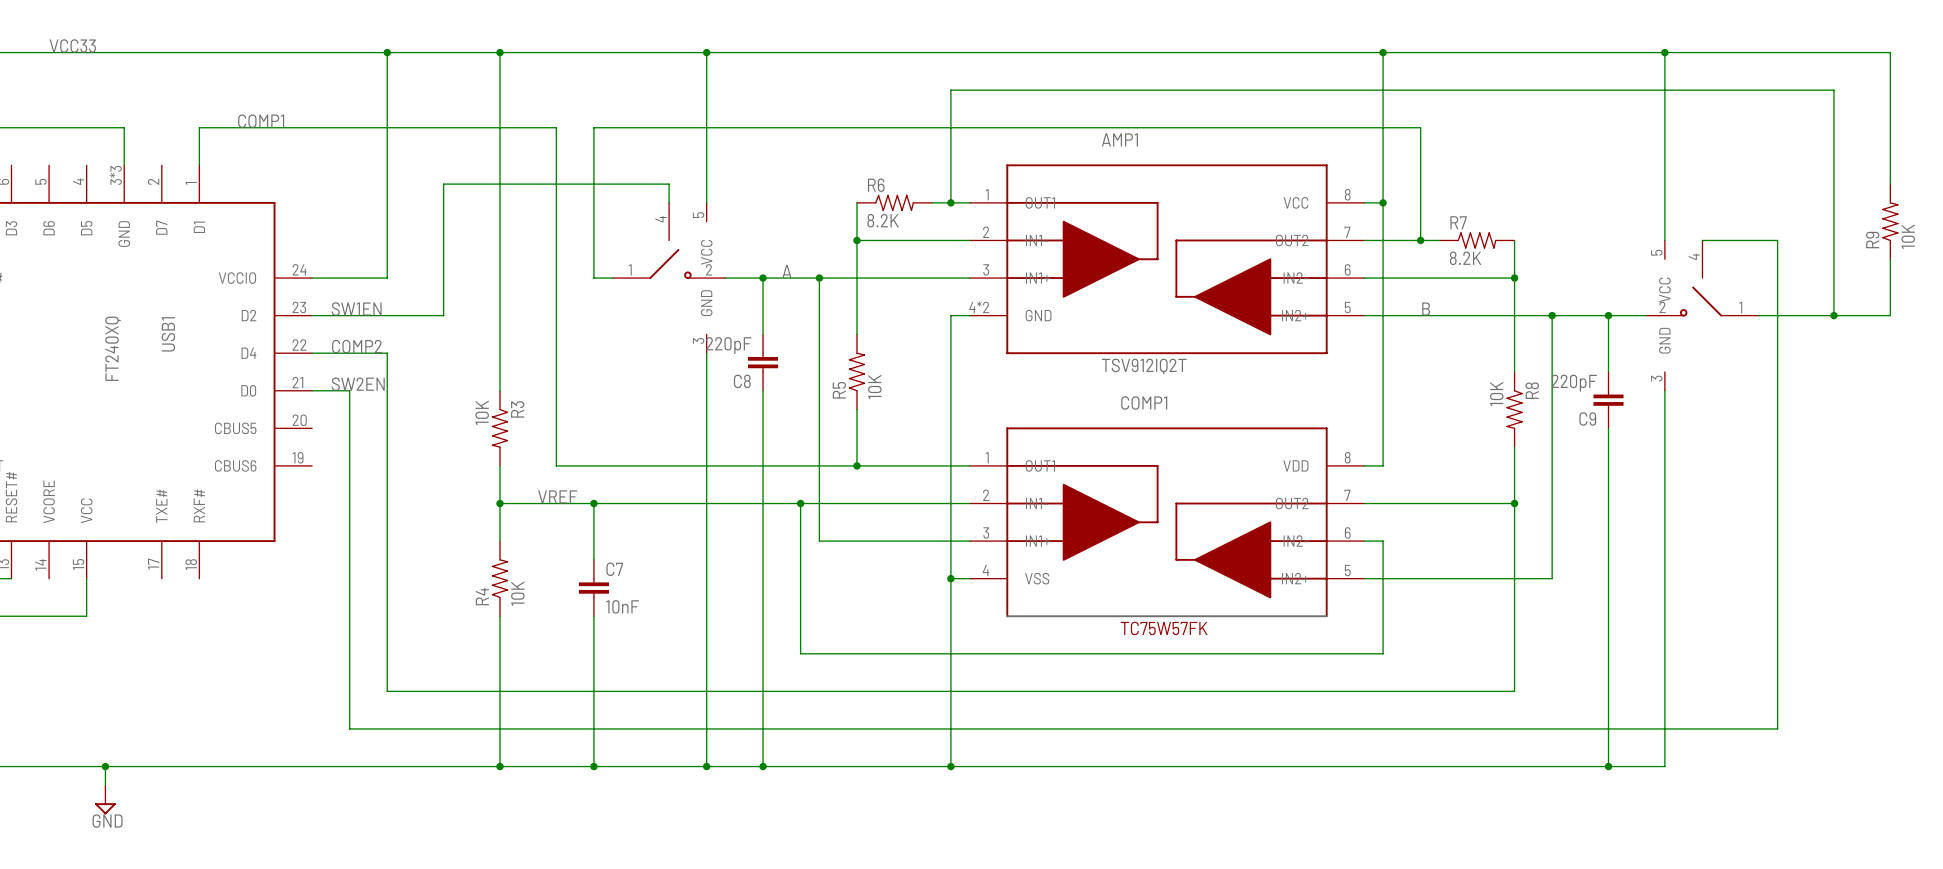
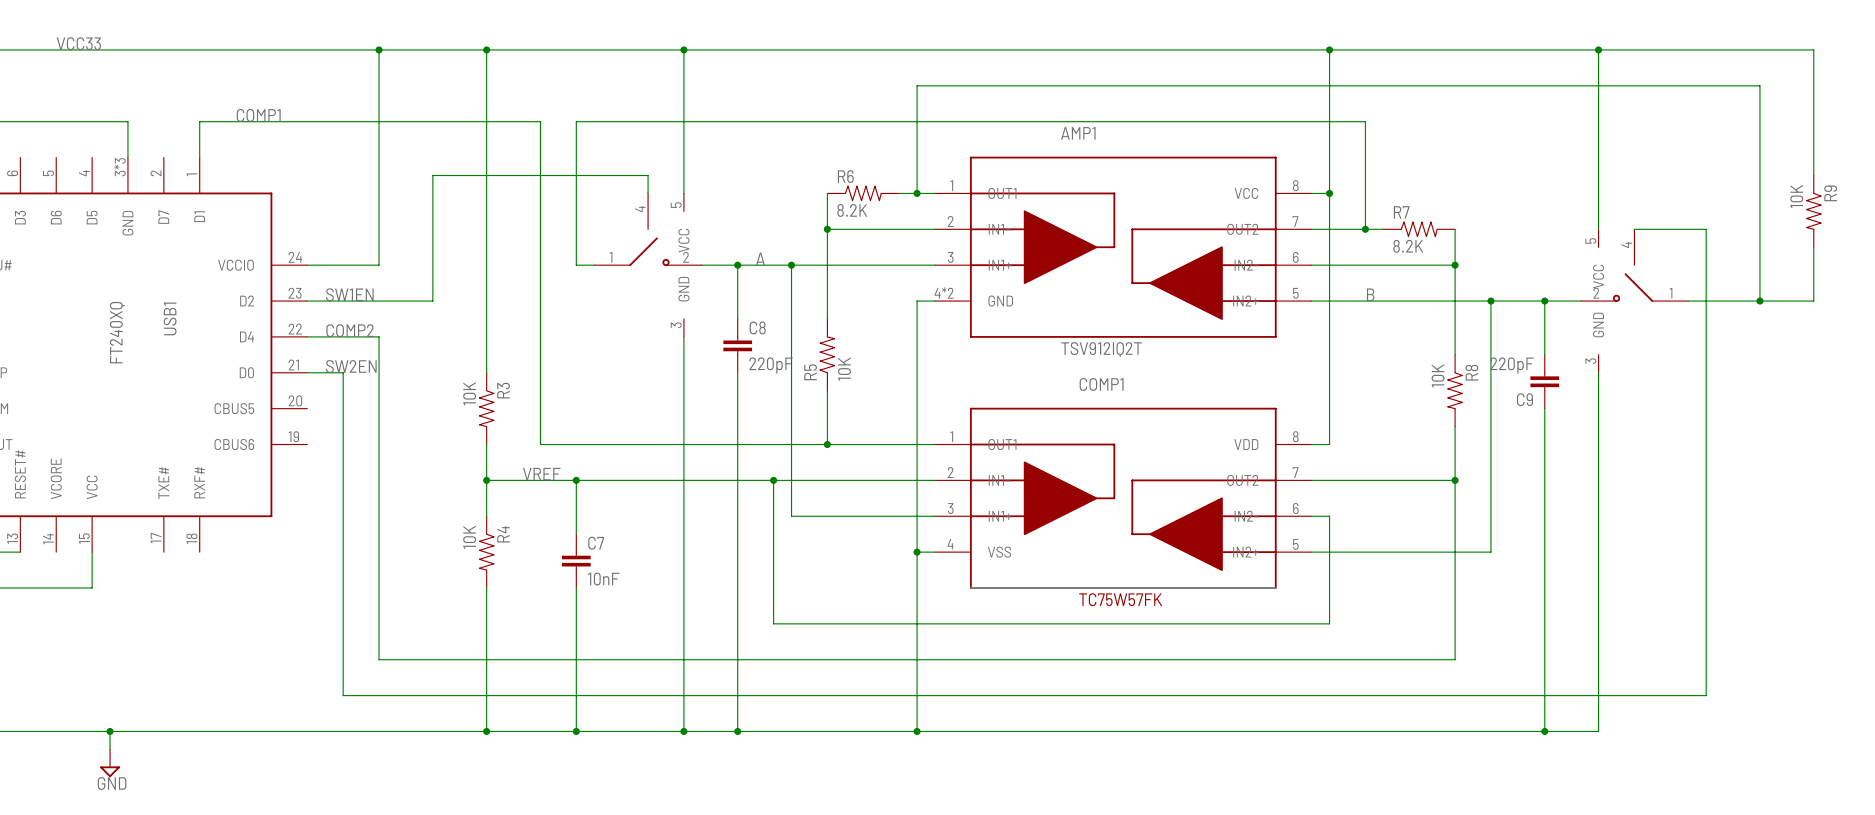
R9 rotation: 0° (1890, 221) -> 180° (1813, 211)
C8 value position: 220pF (728, 345) -> 220pF (771, 365)
C8 name position: C8 (742, 381) -> C8 (757, 327)
R4 rotation: 0° (499, 578) -> 180° (486, 552)

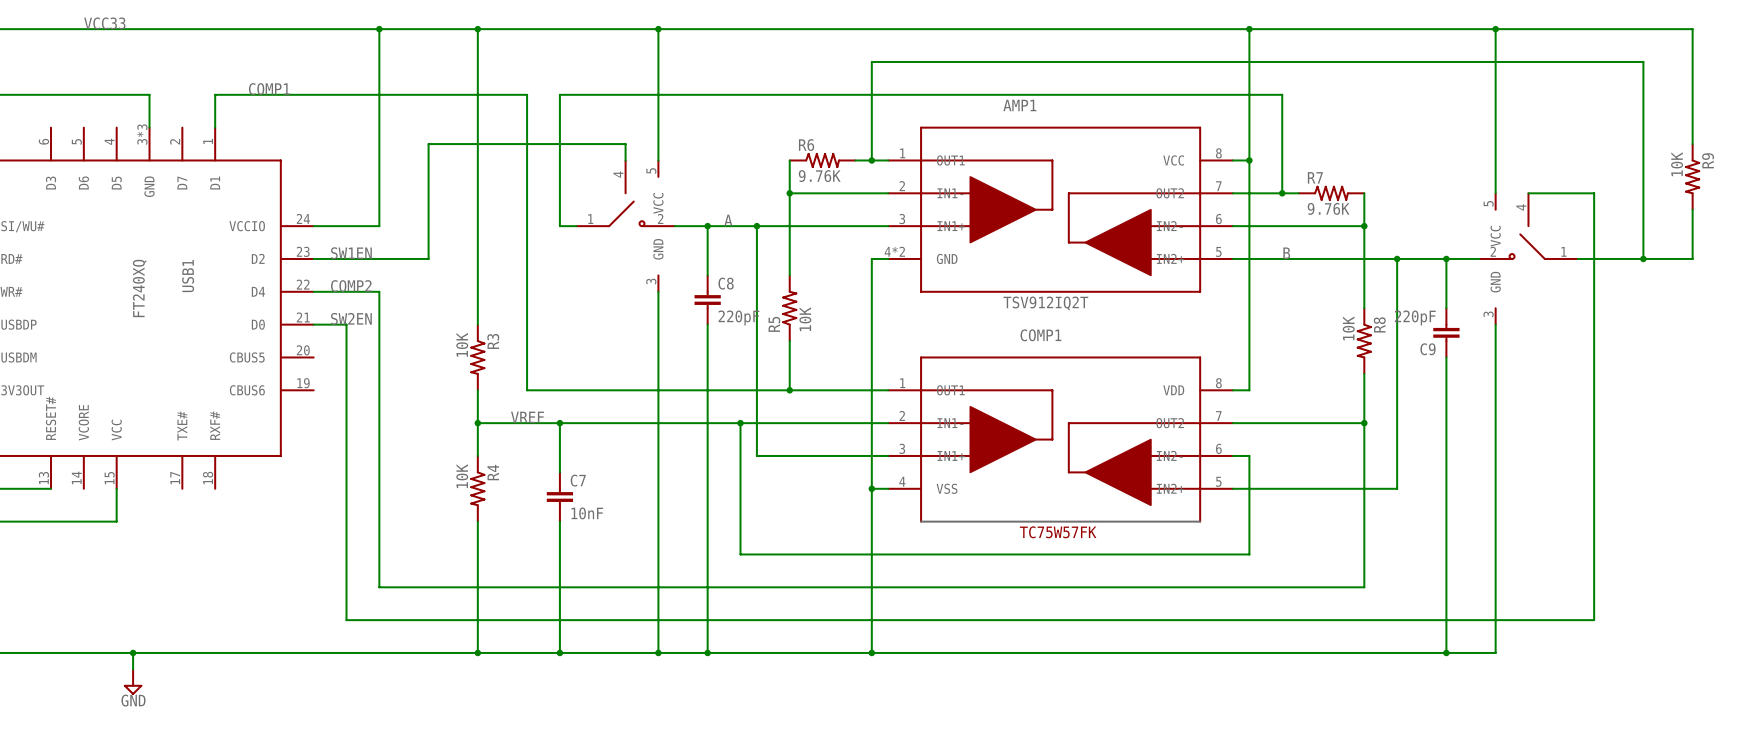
R6 value: 8.2K (852, 210) -> 9.76K (819, 176)
R7 value: 8.2K (1408, 246) -> 9.76K (1328, 208)

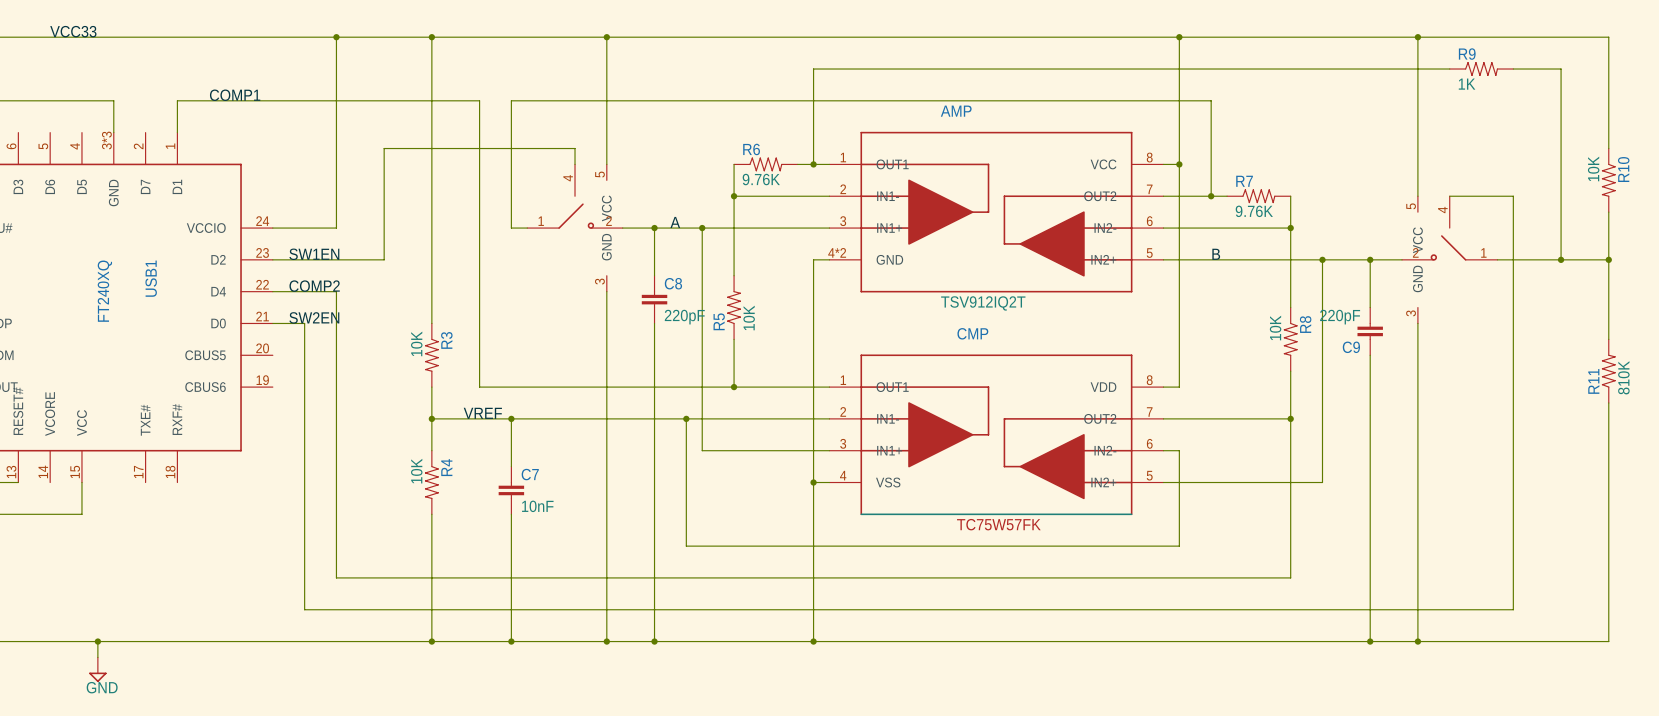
R9: none -> 1K (1481, 69)
AMP1 name: AMP1 (1019, 105) -> AMP (956, 111)
R9 name: R9 (1708, 160) -> R10 (1623, 169)
wire: none -> (1608, 259) (1608, 339)
junction: none -> (1608, 259)
COMP1 name: COMP1 (1040, 335) -> CMP (972, 333)
R11: none -> 810K (1608, 371)
wire: none -> (1608, 402) (1608, 641) (1417, 641)
junction: none -> (1417, 641)

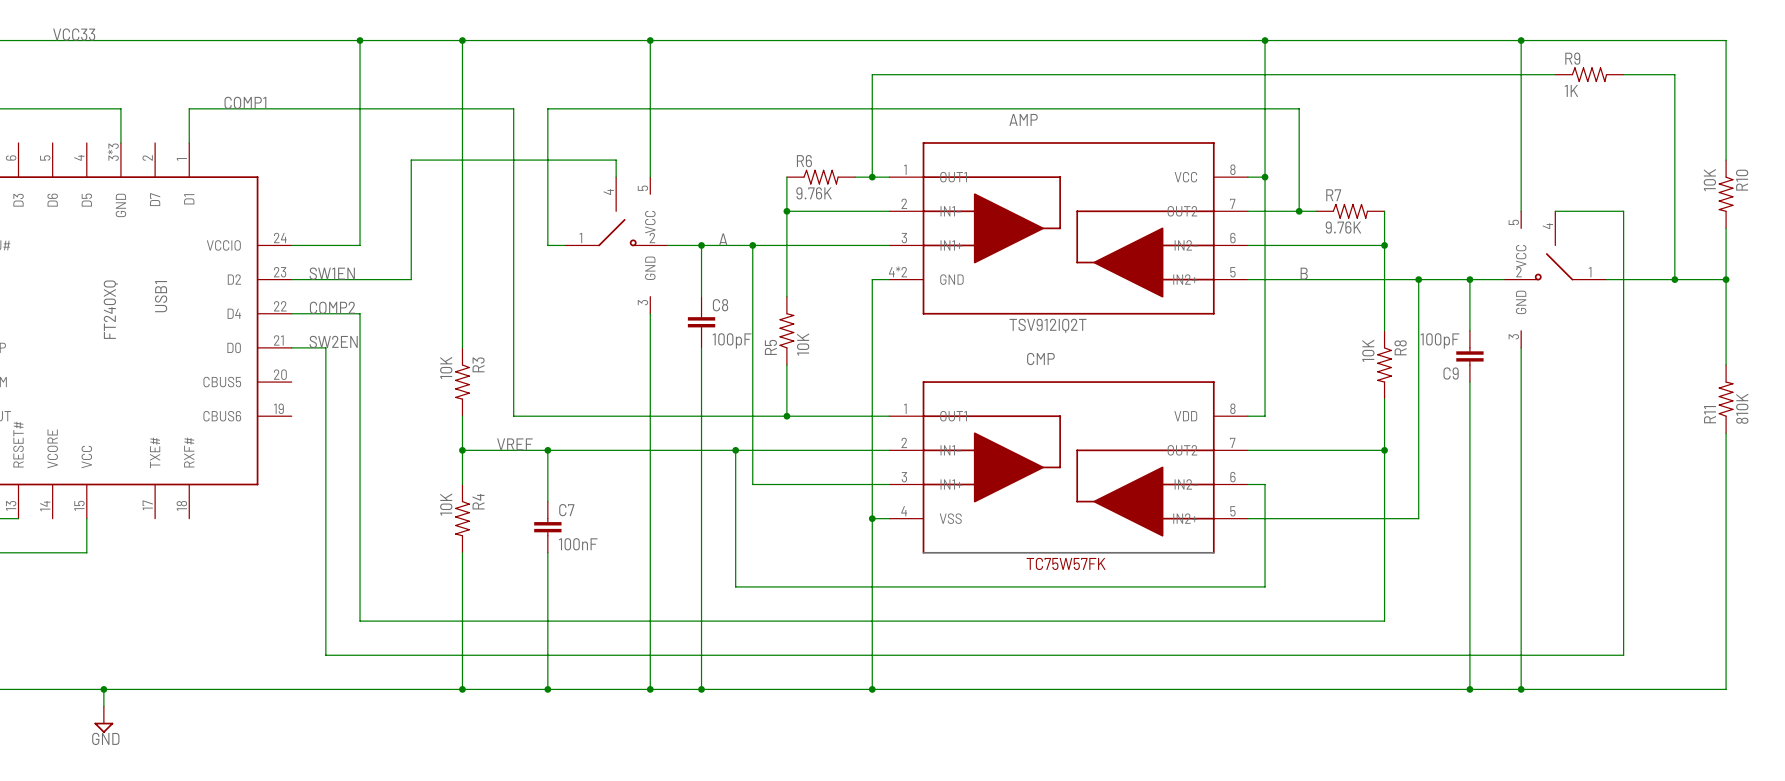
C8 value: 220pF (684, 317) -> 100pF (732, 340)
C9 value: 220pF (1340, 317) -> 100pF (1439, 340)
C7 value: 10nF (537, 506) -> 100nF (578, 544)

